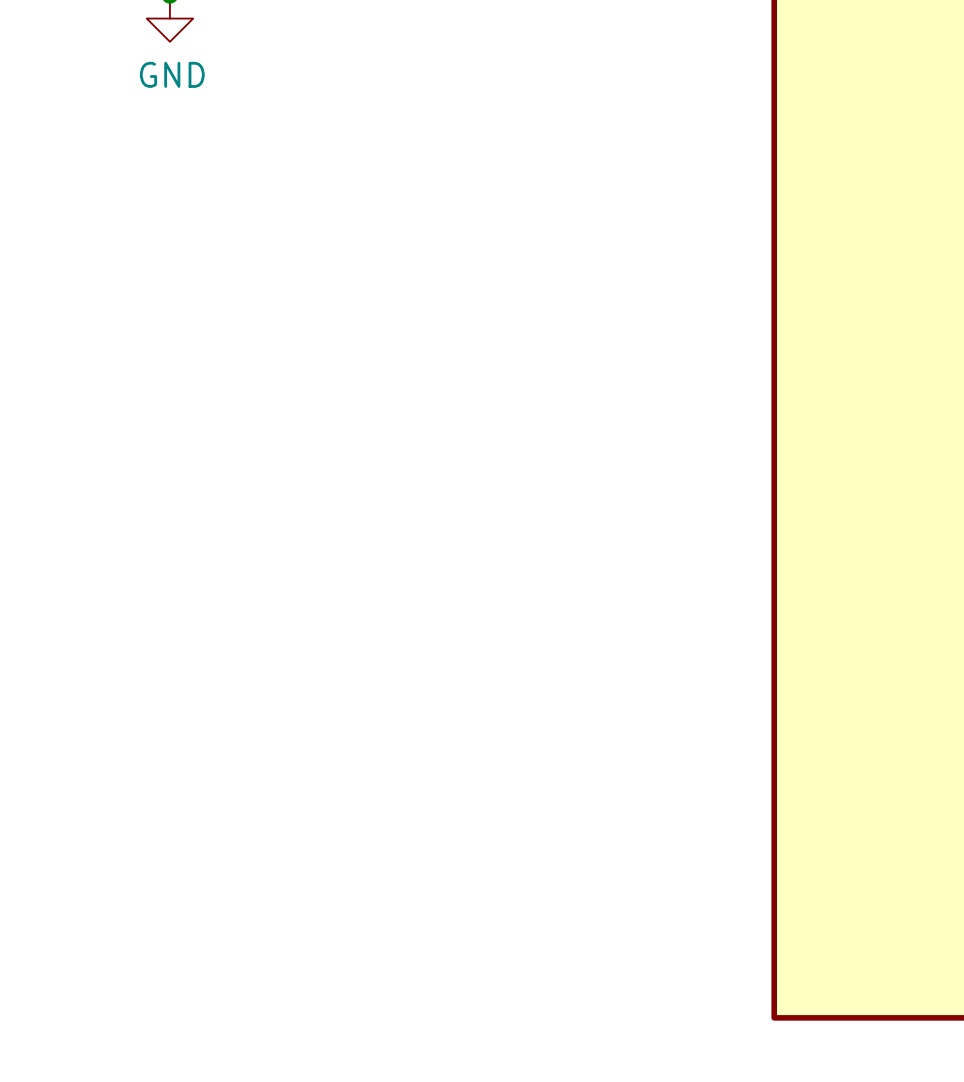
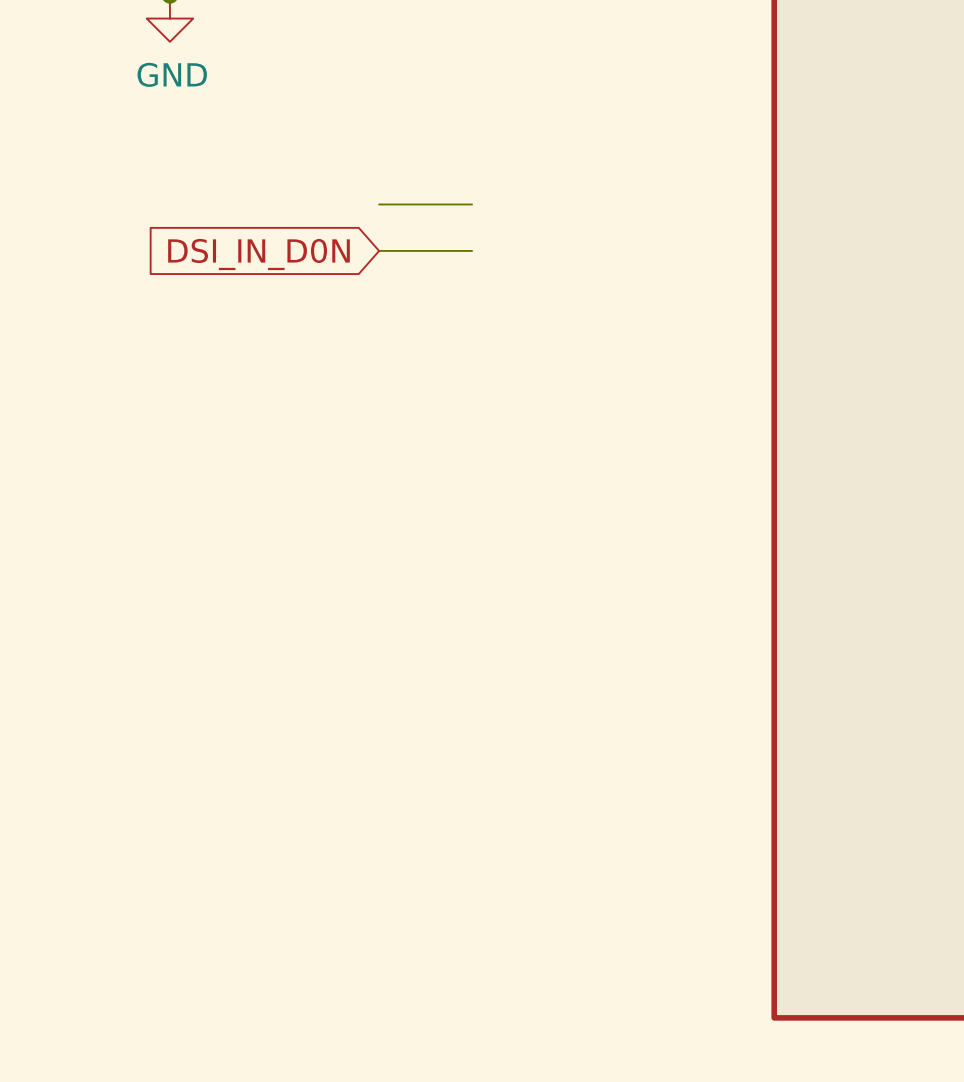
wire: none -> (379, 204) (472, 204)
wire: none -> (379, 250) (472, 250)
global label: none -> DSI_IN_D0N (258, 254)

